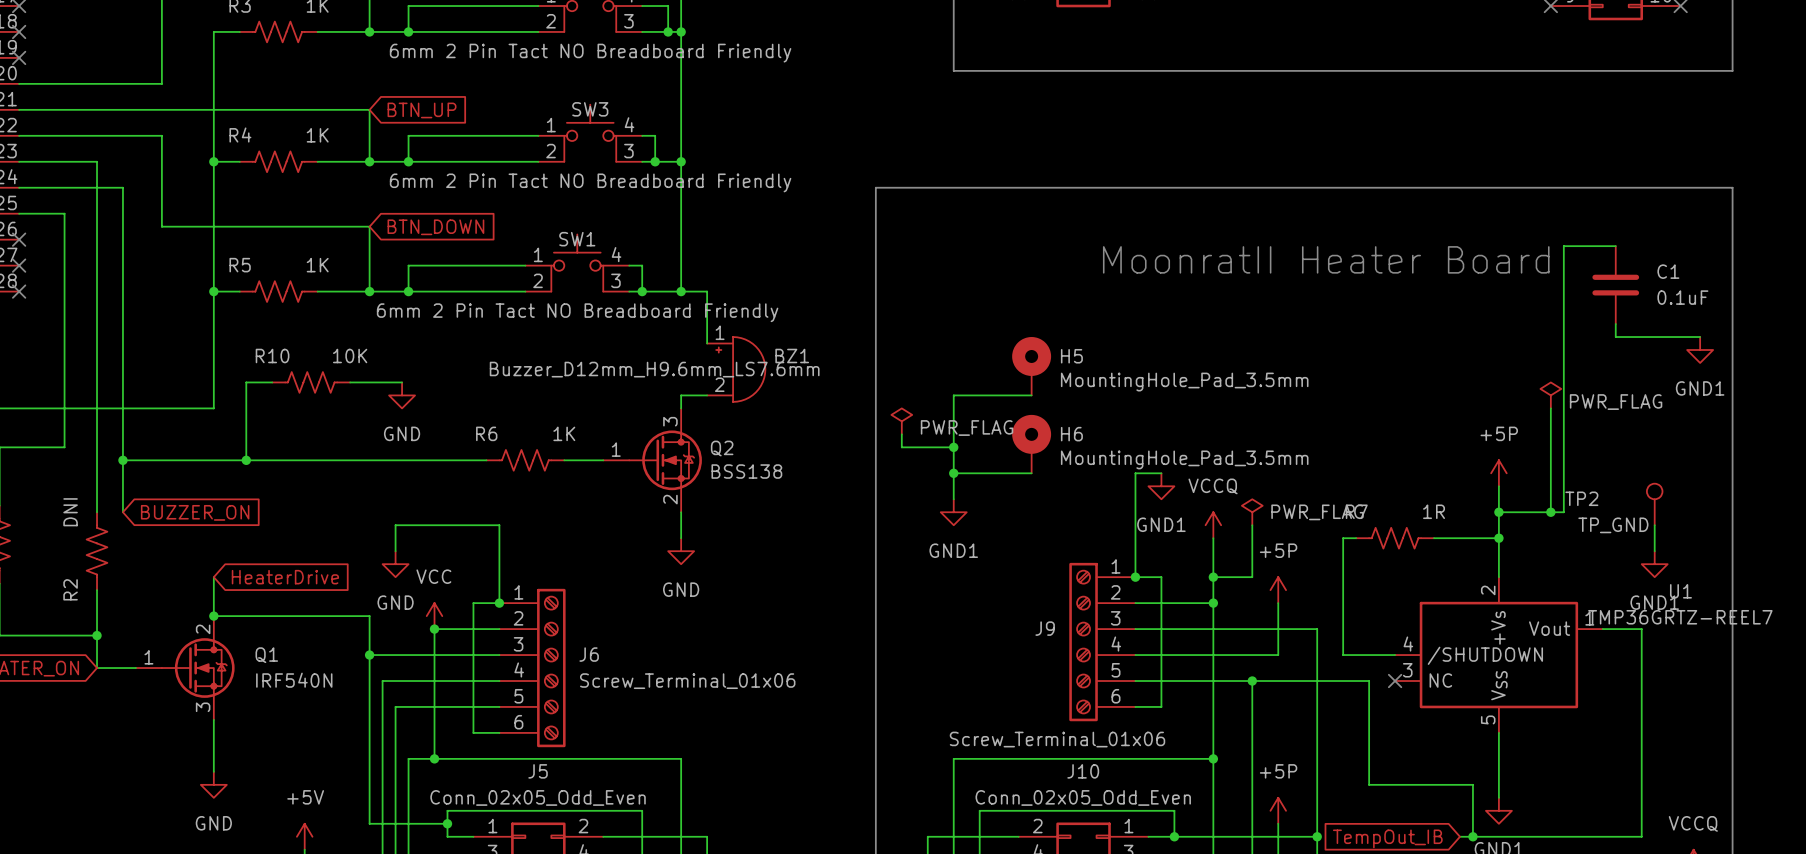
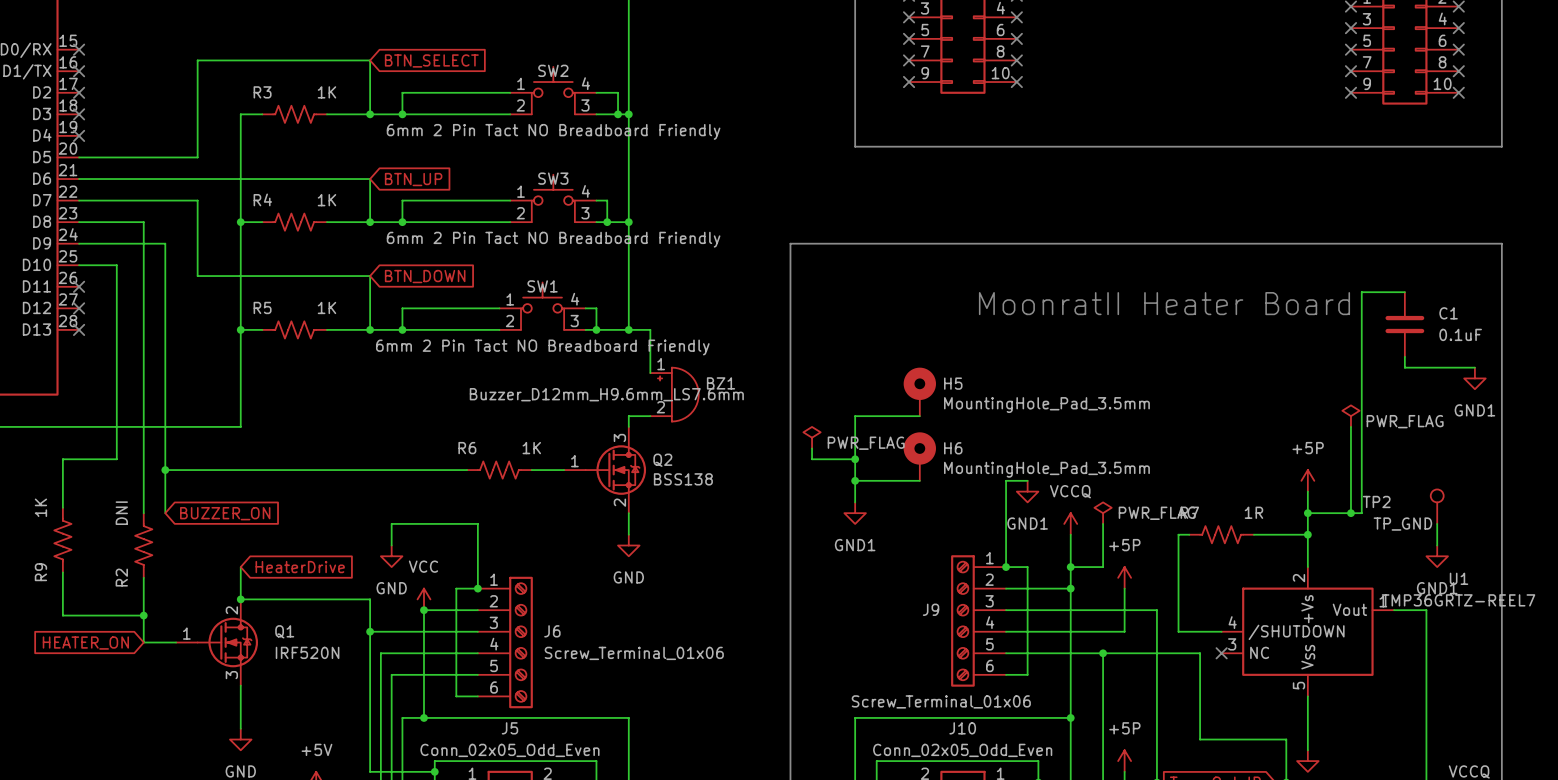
wire: (272, 382) (246, 382) (246, 460) -> none
R10: 10K (311, 382) -> none
wire: (350, 382) (402, 382) -> none
power symbol: GND (402, 395) -> none
junction: (246, 460) -> none
Q1 value: IRF540N (294, 680) -> IRF520N (307, 652)

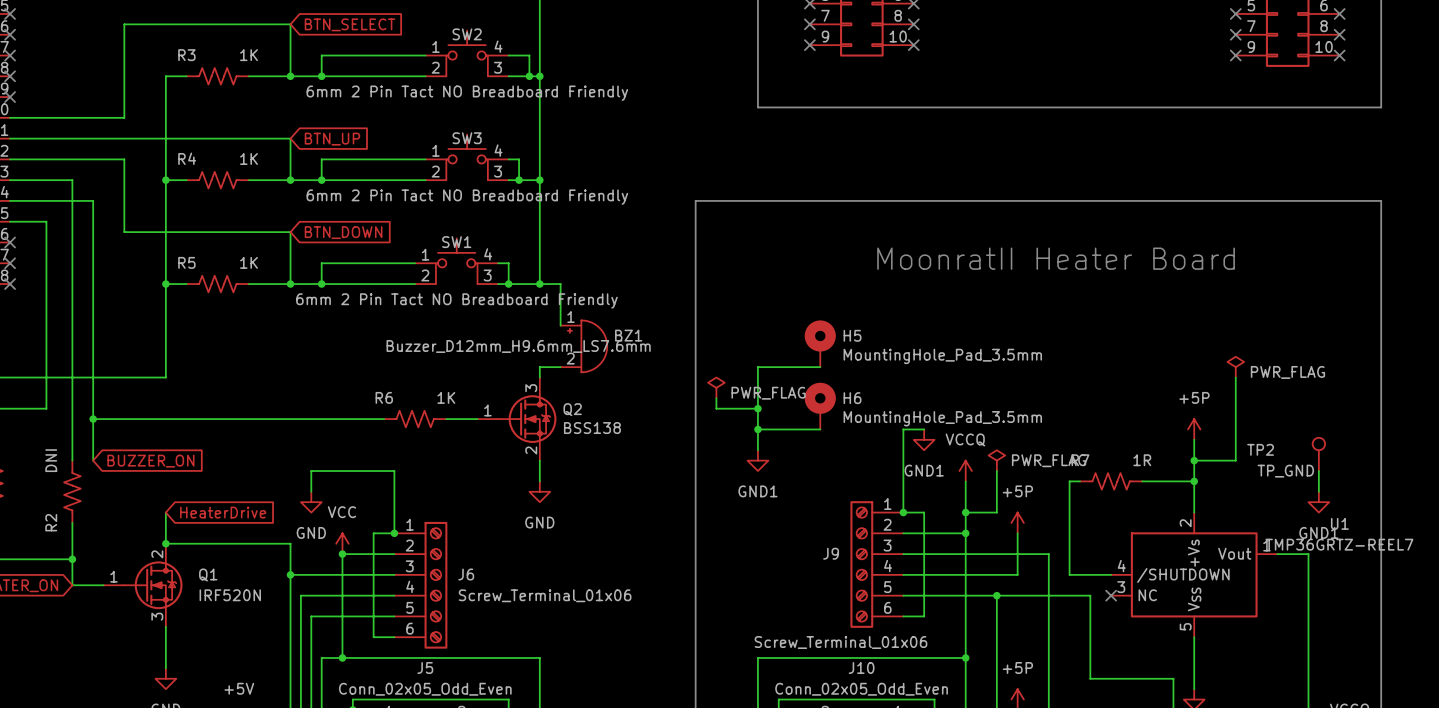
wire: (1404, 292) (1361, 292) (1361, 513) (1350, 513) -> none
C1: 0.1uF (1404, 324) -> none
wire: (1404, 356) (1404, 367) (1474, 367) -> none
power symbol: GND1 (1474, 378) -> none
junction: (1350, 513) -> none

